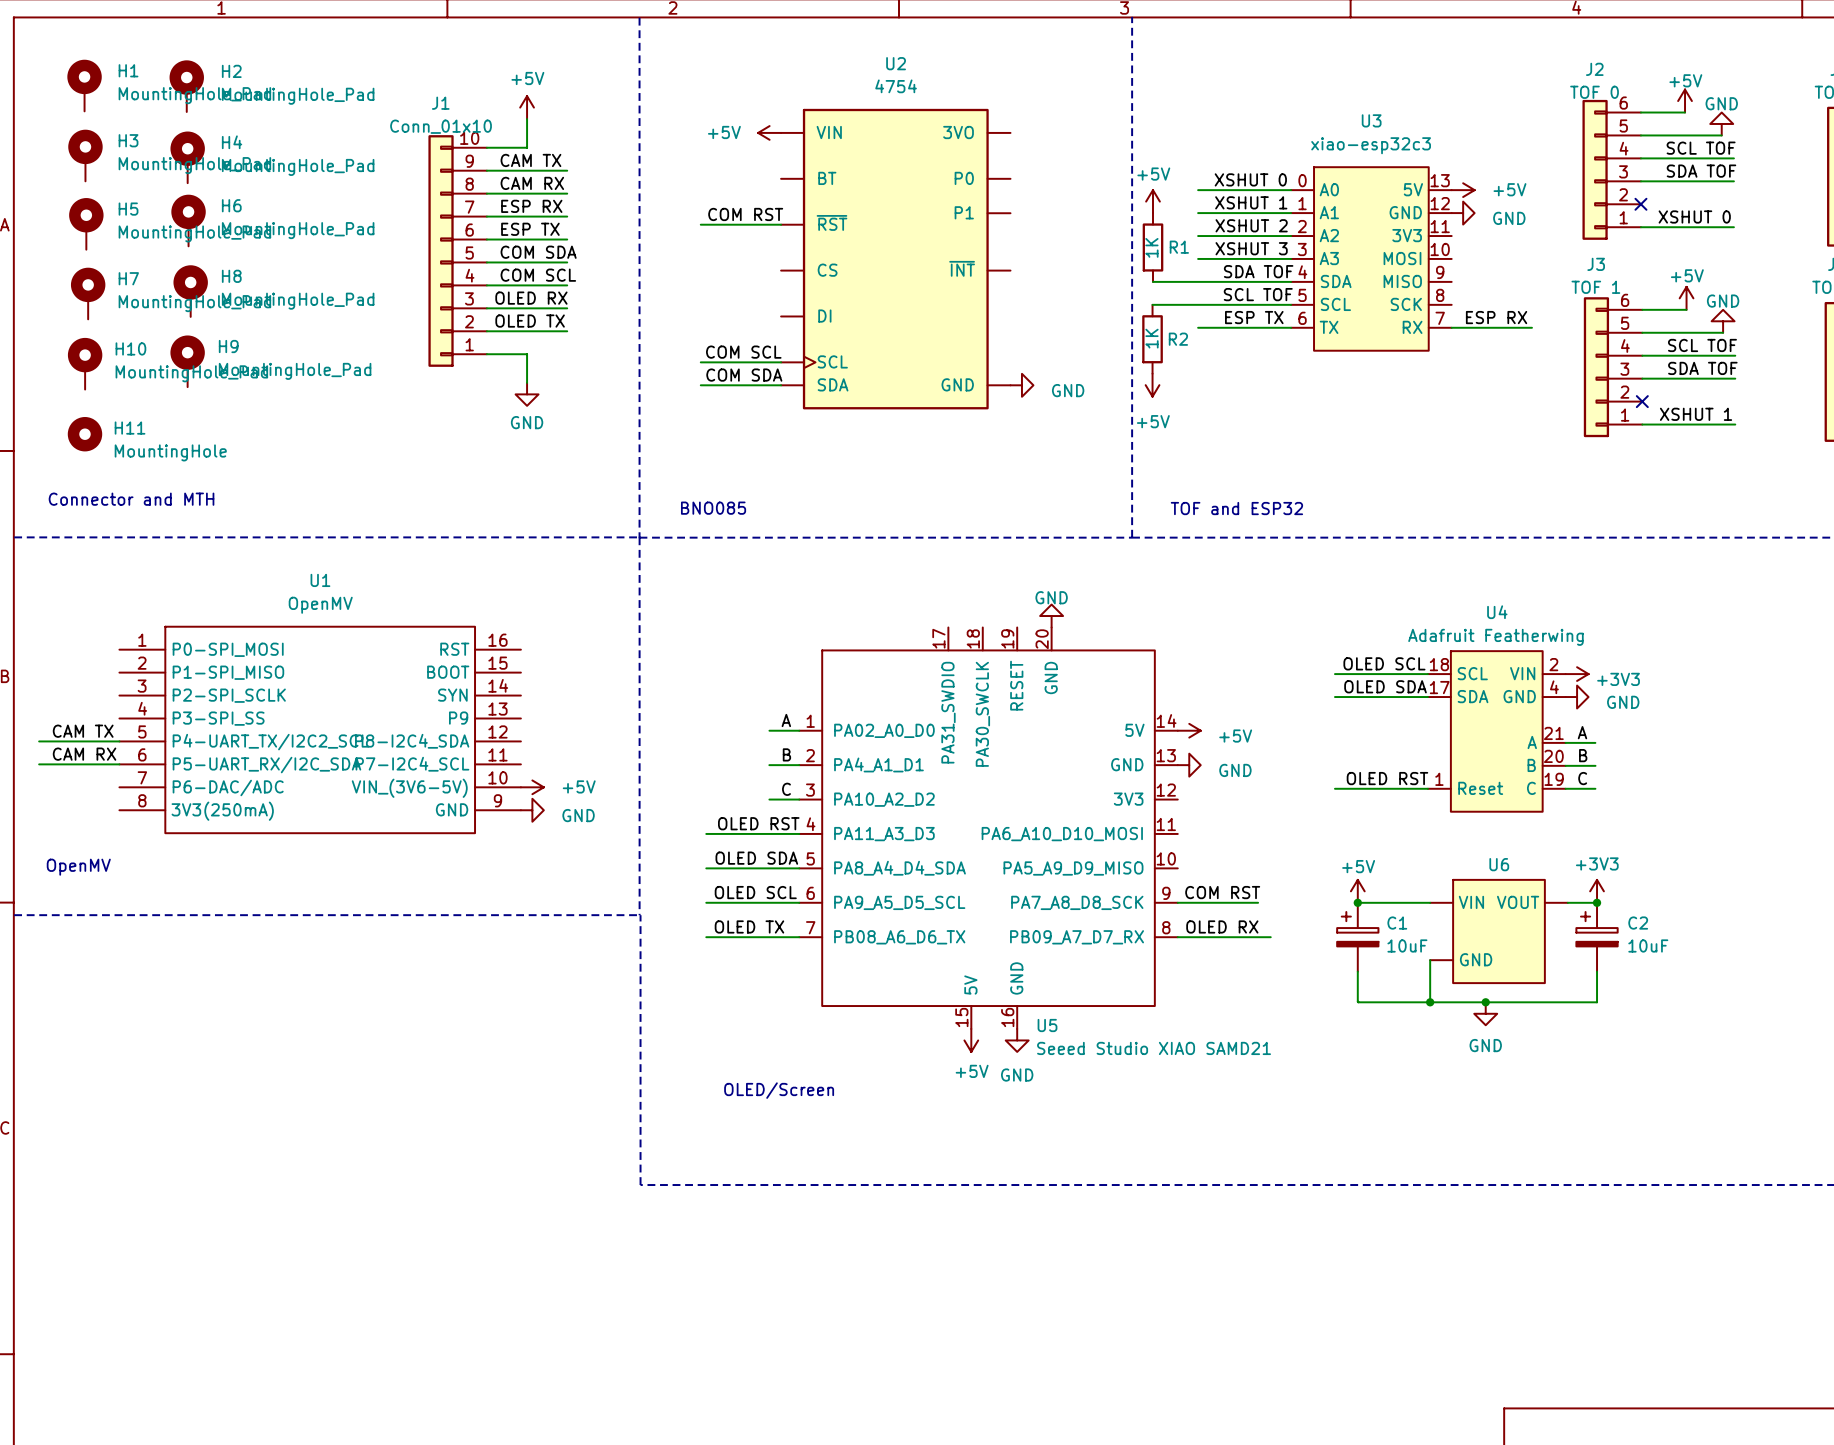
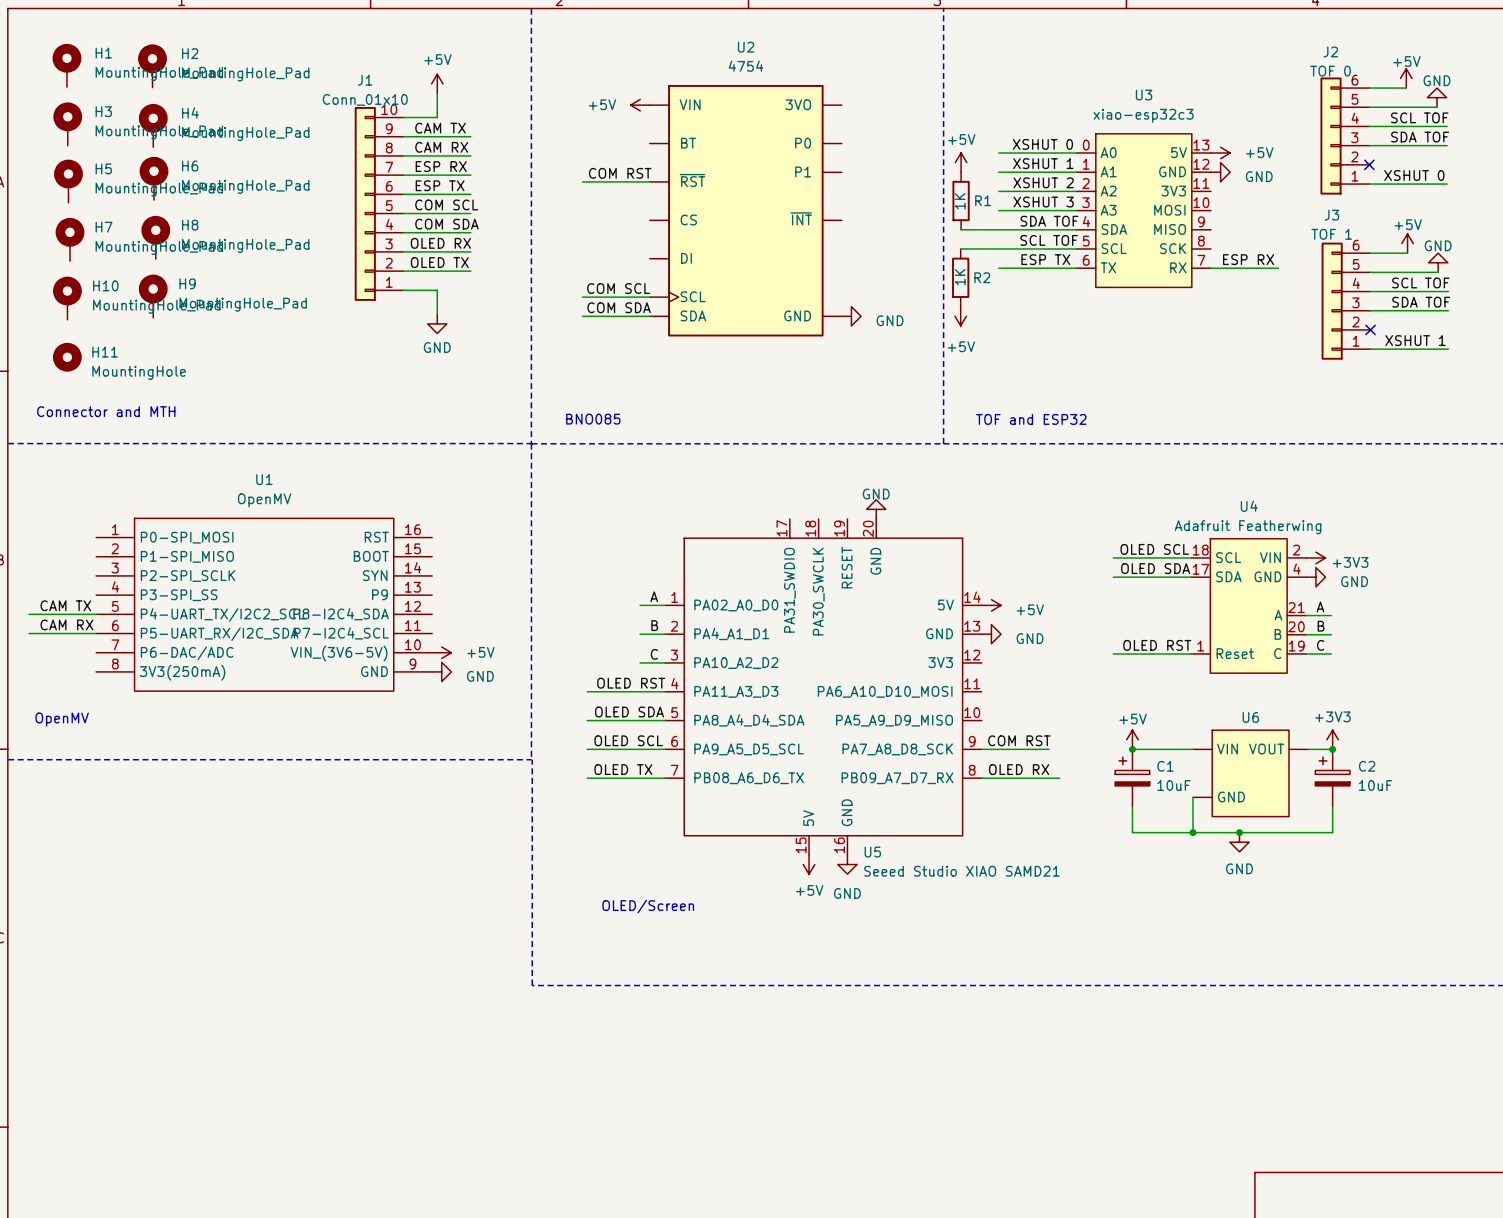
label: COM SDA (538, 252) -> COM SCL (446, 204)
label: COM SCL (538, 275) -> COM SDA (446, 224)

